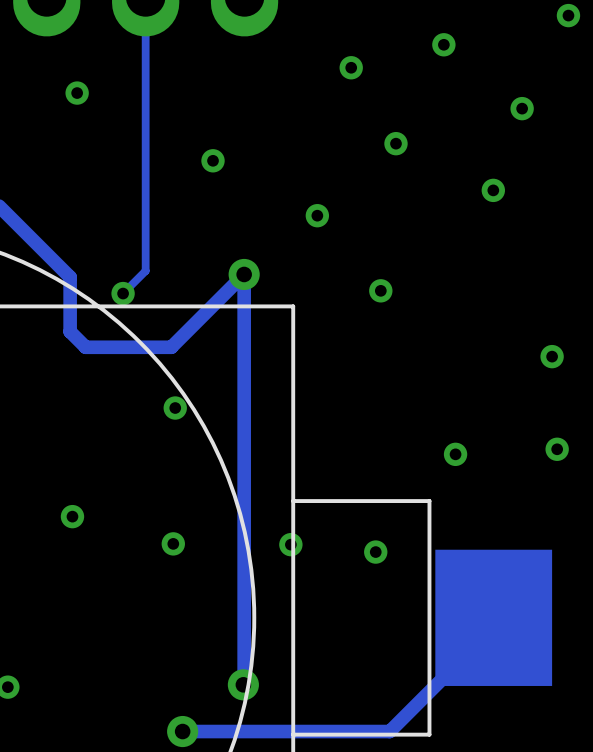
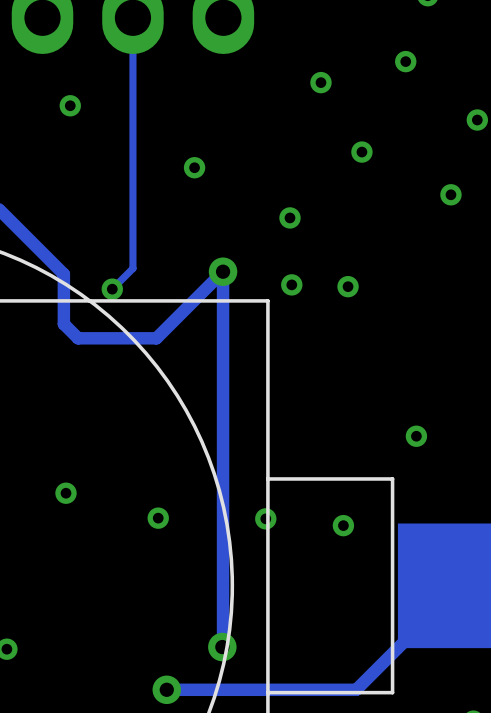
part position: (175, 408) -> (291, 284)

